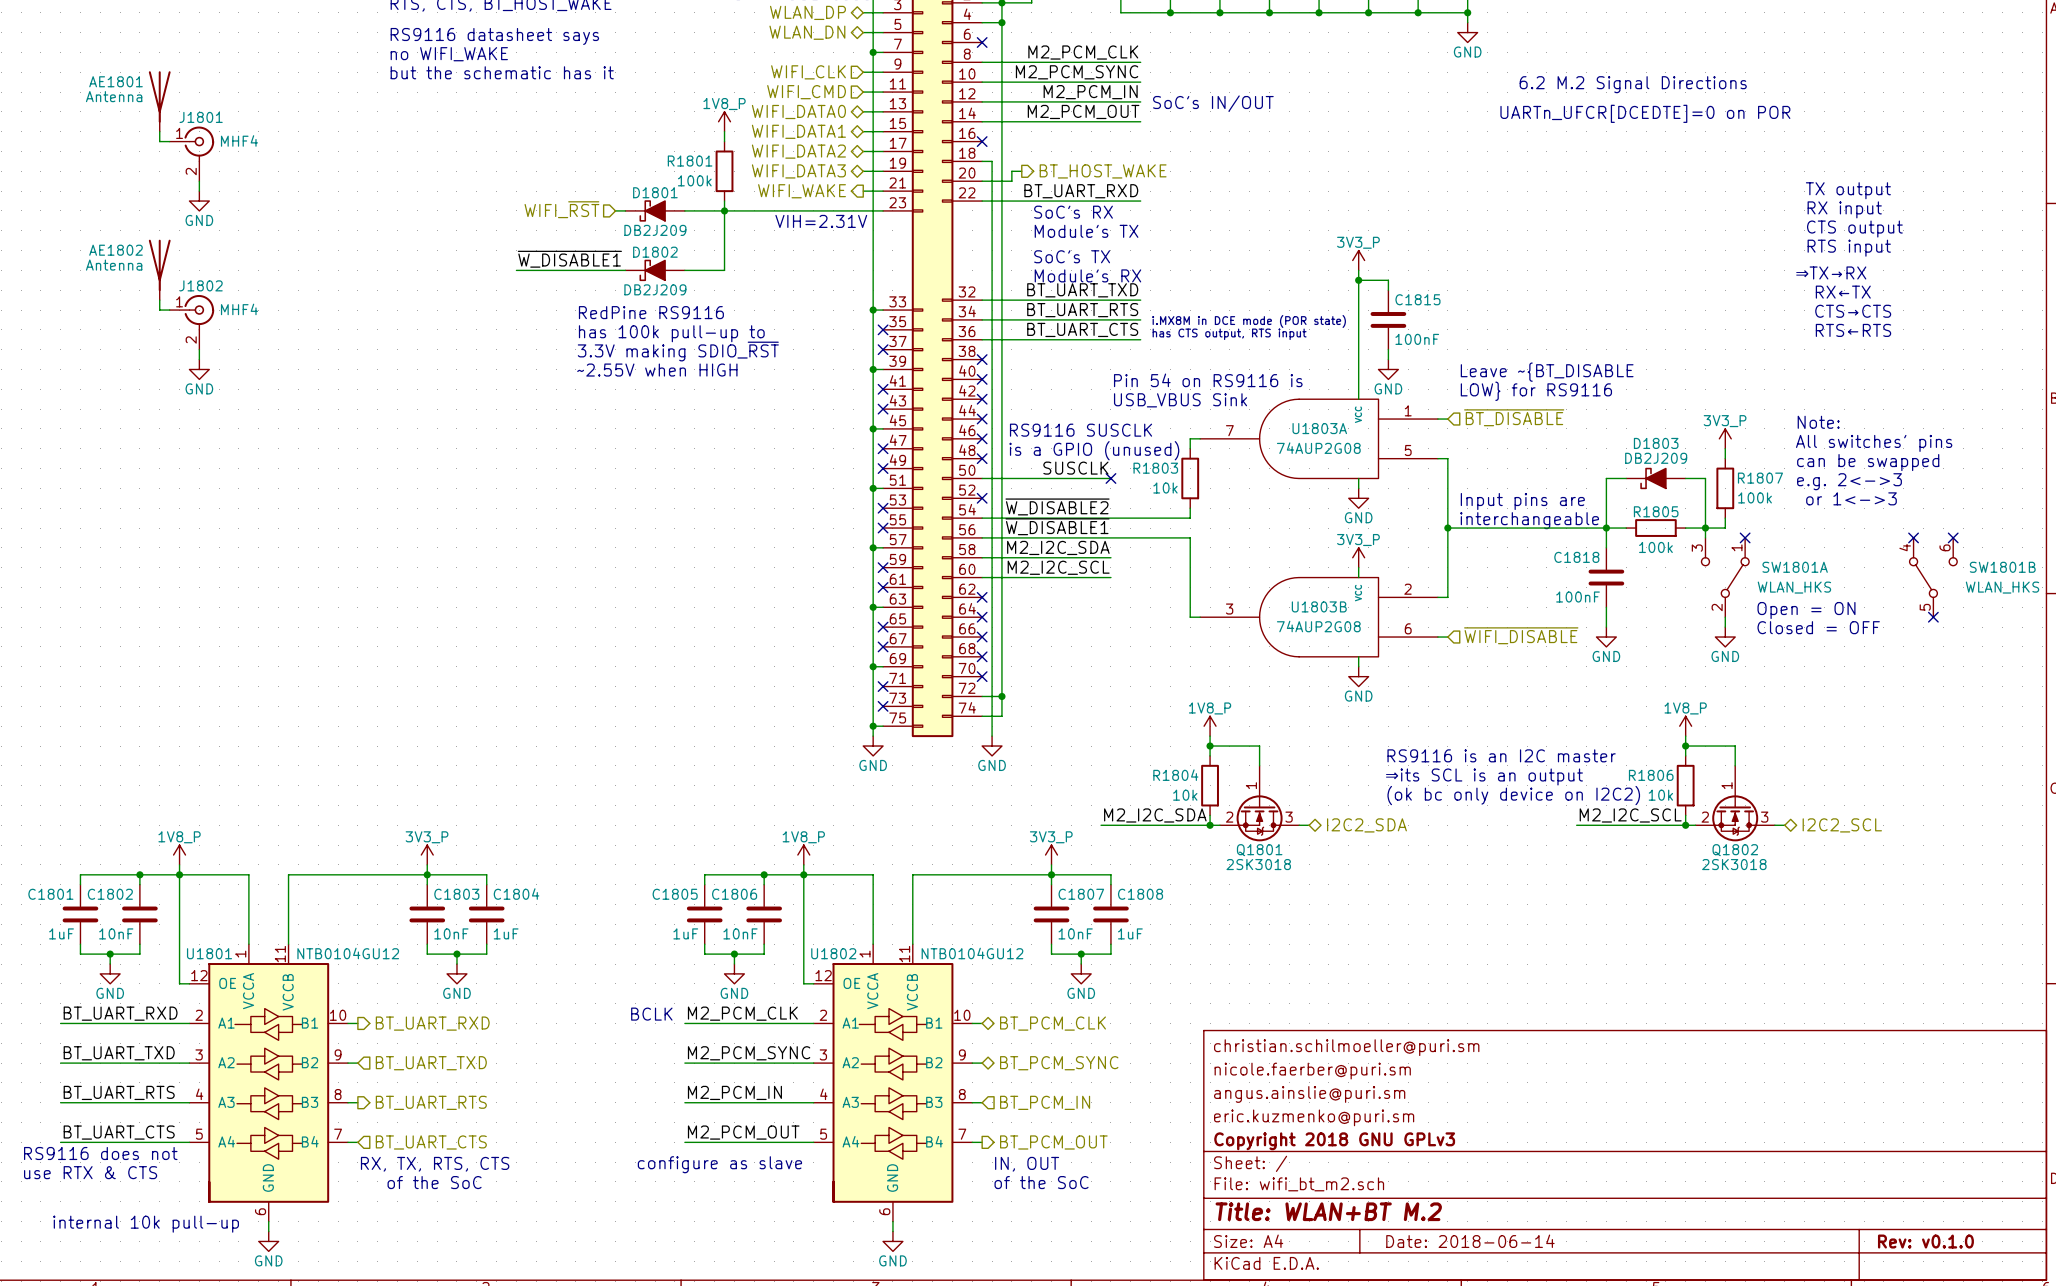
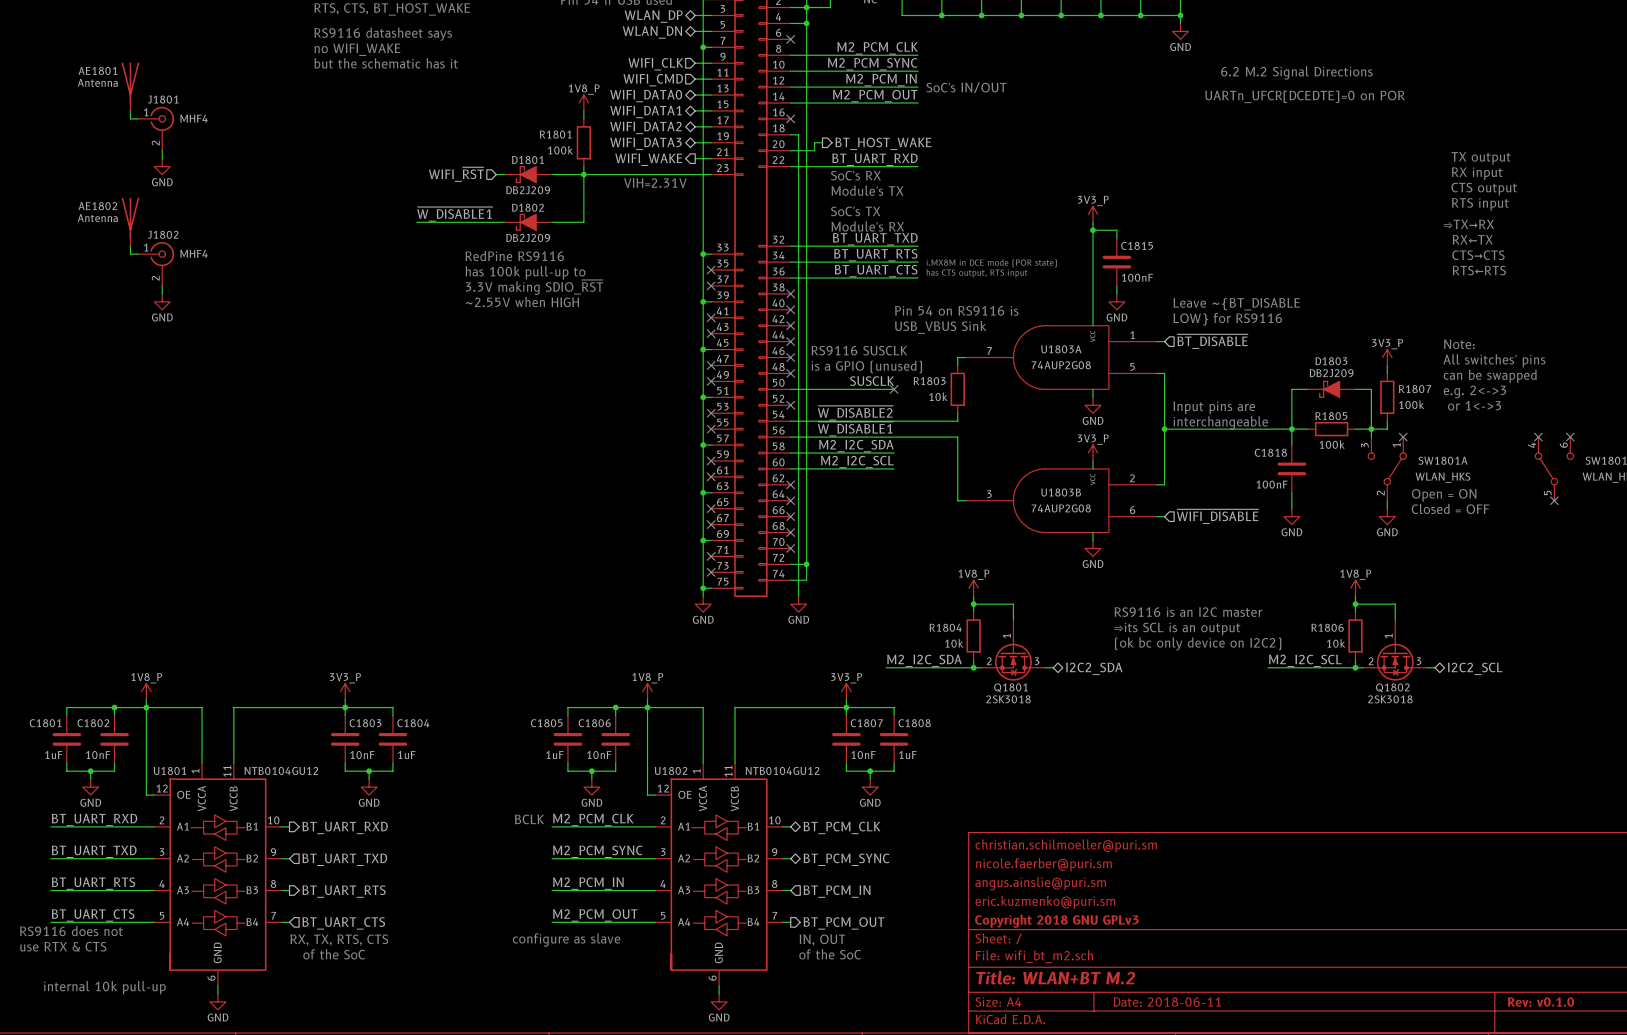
title block: Date: 2018-06-14 (1470, 1241) -> Date: 2018-06-11 (1167, 1002)

